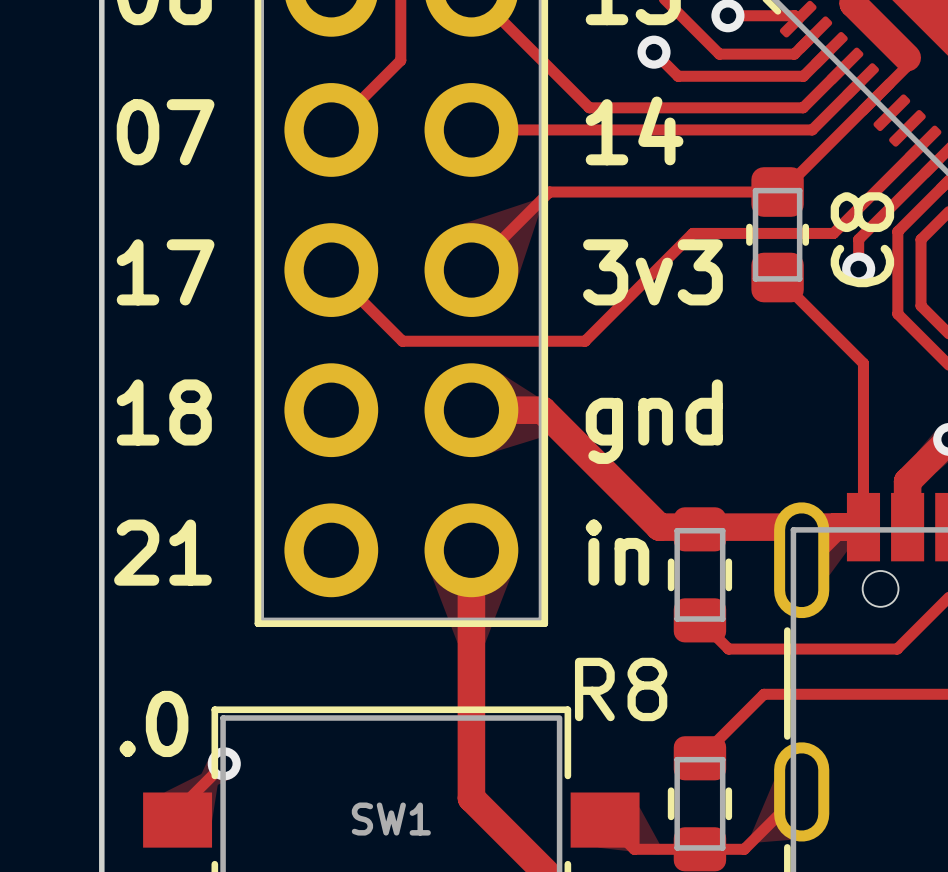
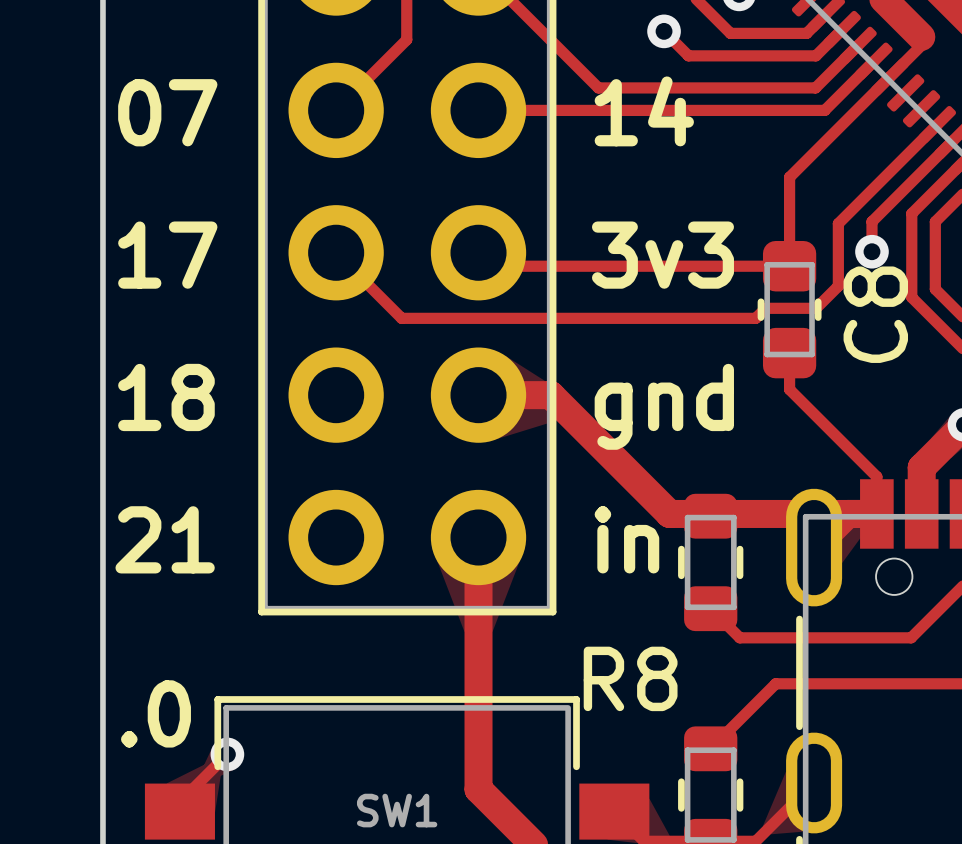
track: (781, 192) (549, 192) (471, 270) -> (793, 173) (789, 177) (789, 266) (491, 266) (478, 252)
track: (833, 233) (692, 233) (585, 341) (402, 341) (395, 334) -> (846, 215) (838, 223) (838, 286) (816, 308) (765, 308) (755, 318) (401, 318)
C8 position: (777, 234) -> (789, 309)
track: (777, 277) (863, 363) (863, 490) -> (789, 353) (789, 389) (876, 476)

